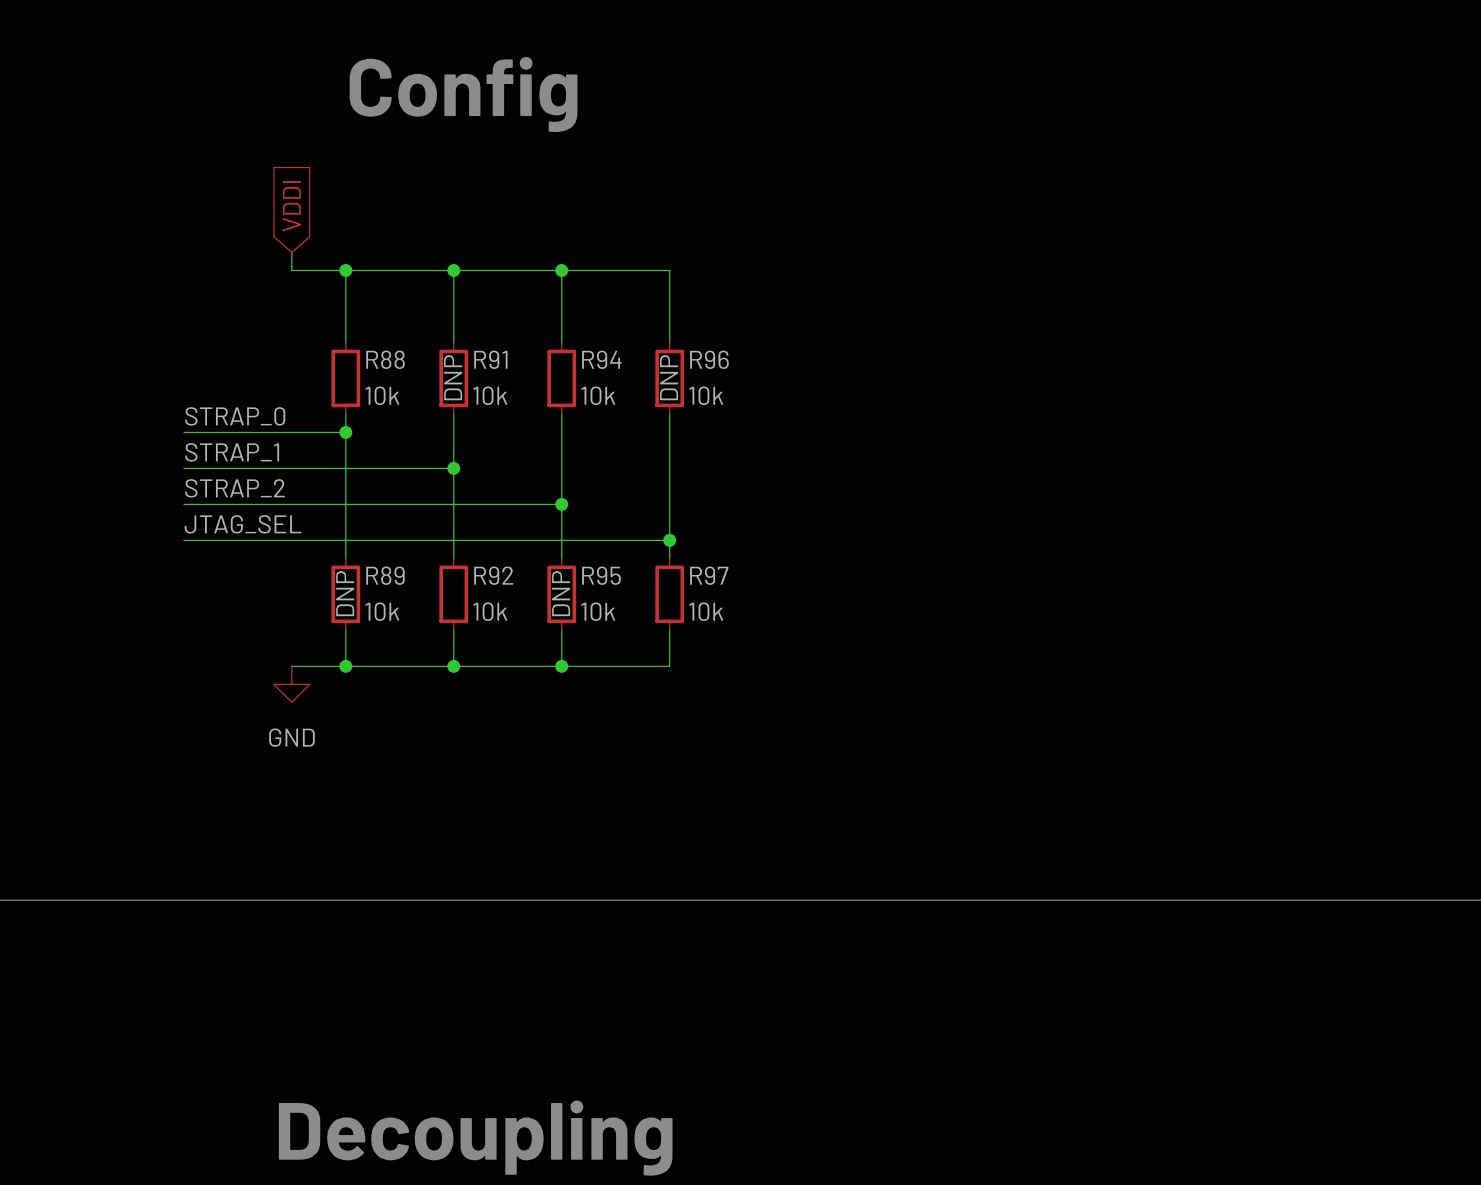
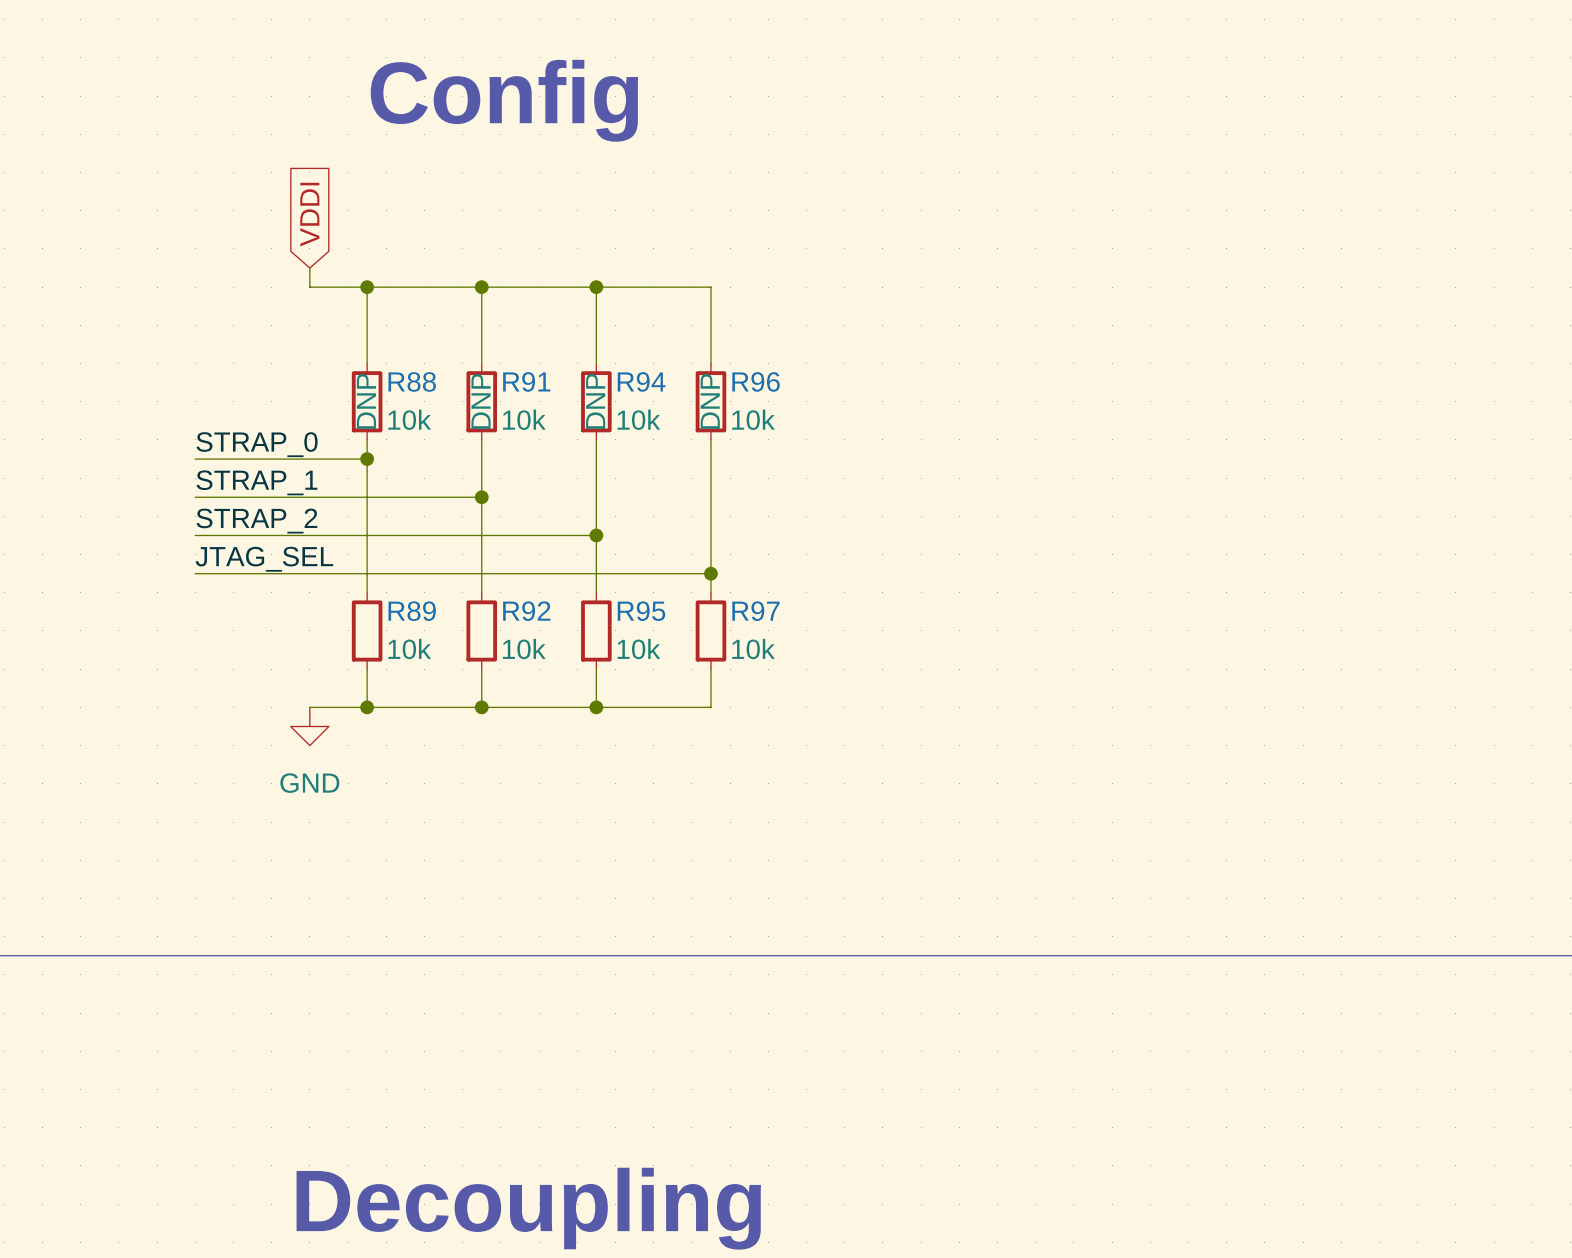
R88 text: none -> DNP (366, 401)
R94 text: none -> DNP (595, 401)
R89 text: DNP (345, 593) -> none
R95 text: DNP (561, 593) -> none

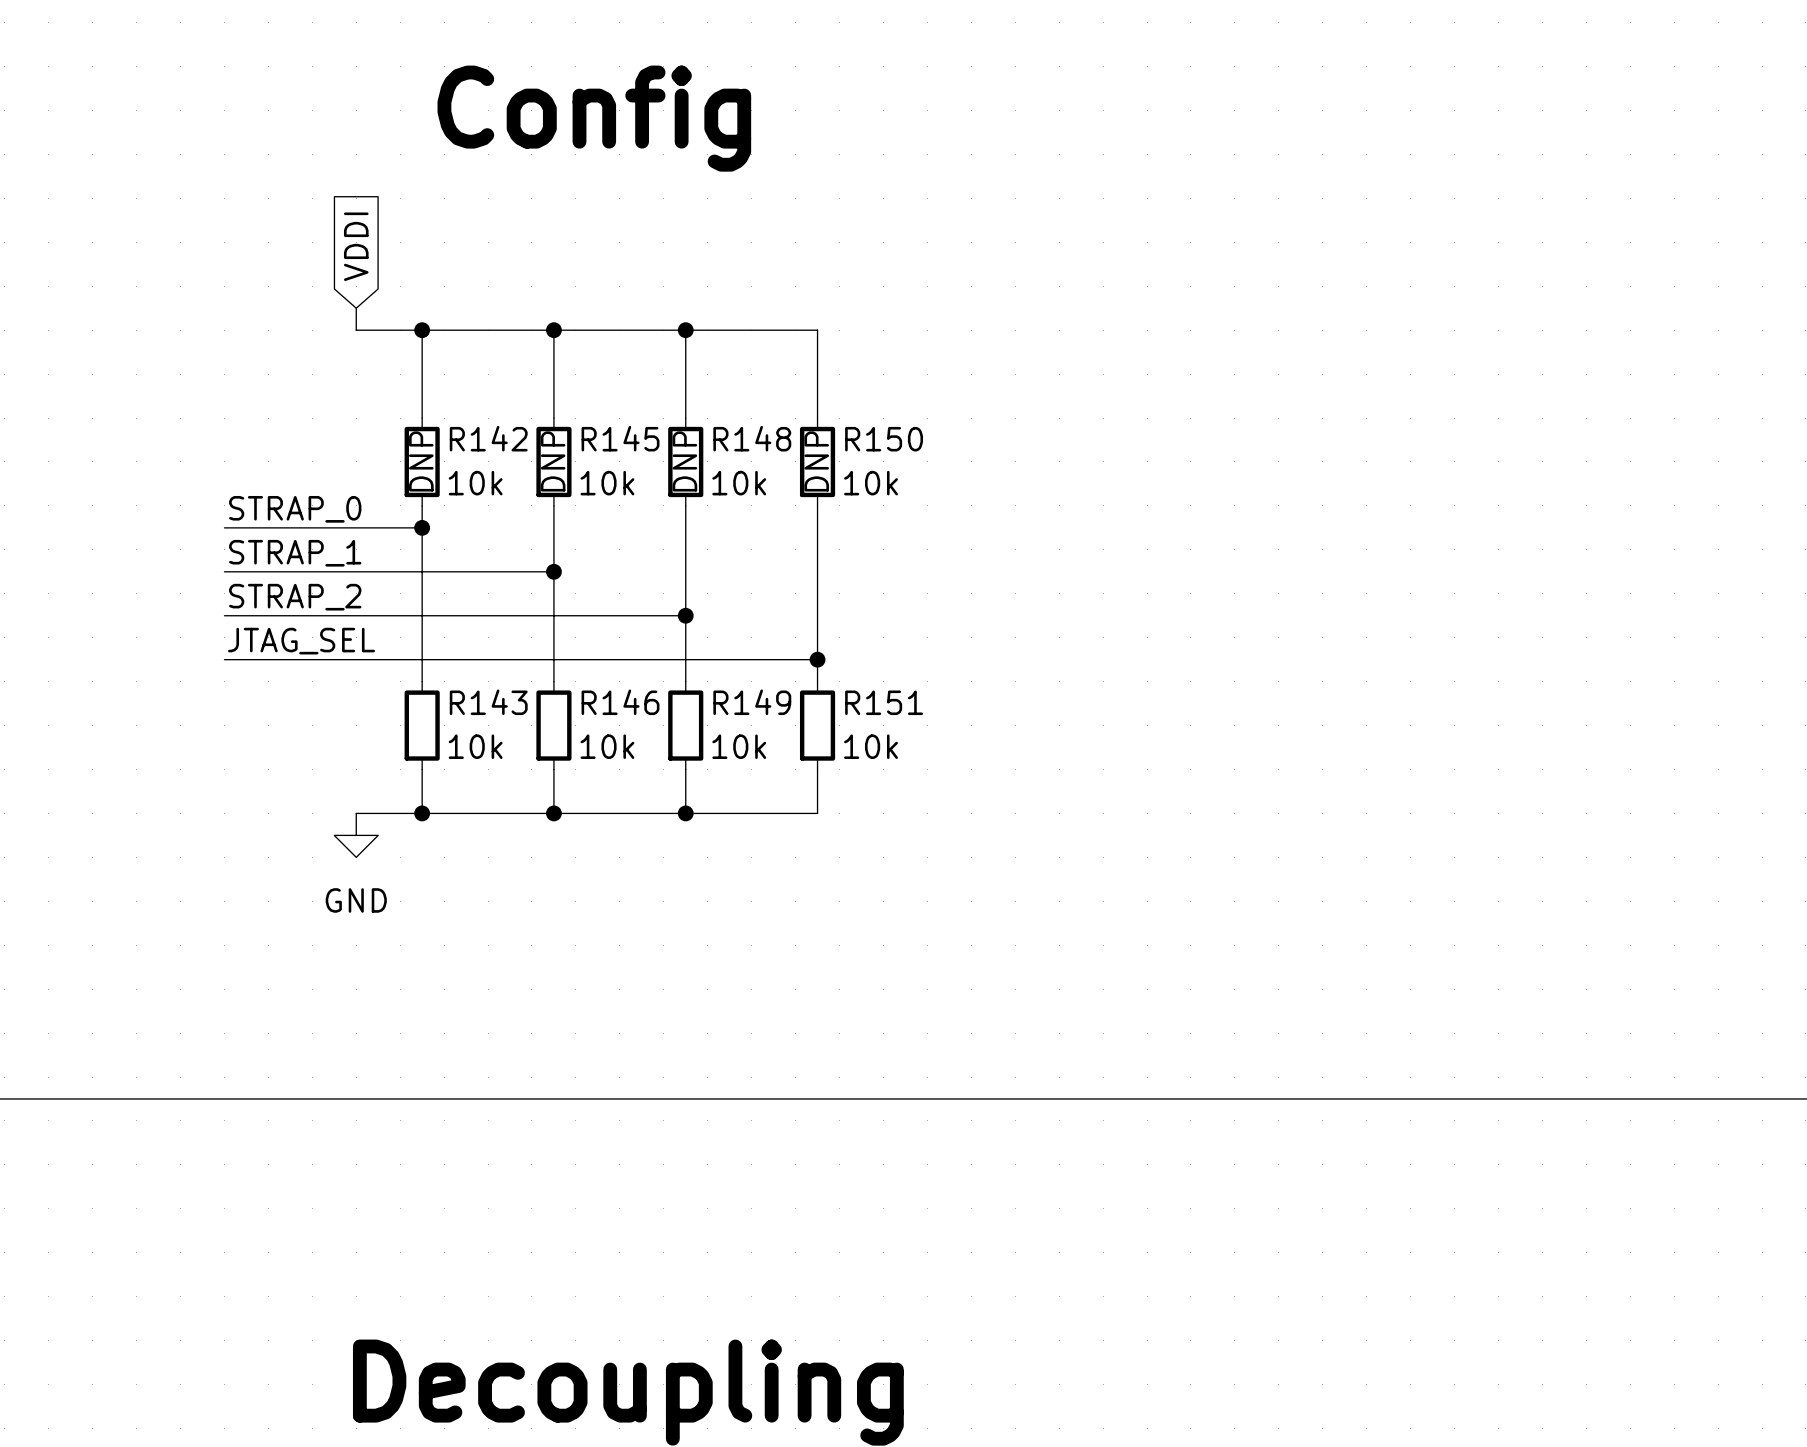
R88 name: R88 (412, 381) -> R142 (488, 438)
R91 name: R91 (526, 381) -> R145 (620, 438)
R94 name: R94 (641, 381) -> R148 (752, 438)
R96 name: R96 (756, 381) -> R150 (884, 439)
R89 name: R89 (412, 611) -> R143 (488, 702)
R92 name: R92 (526, 611) -> R146 (620, 702)
R95 name: R95 (641, 611) -> R149 (752, 702)
R97 name: R97 (755, 611) -> R151 (884, 702)

